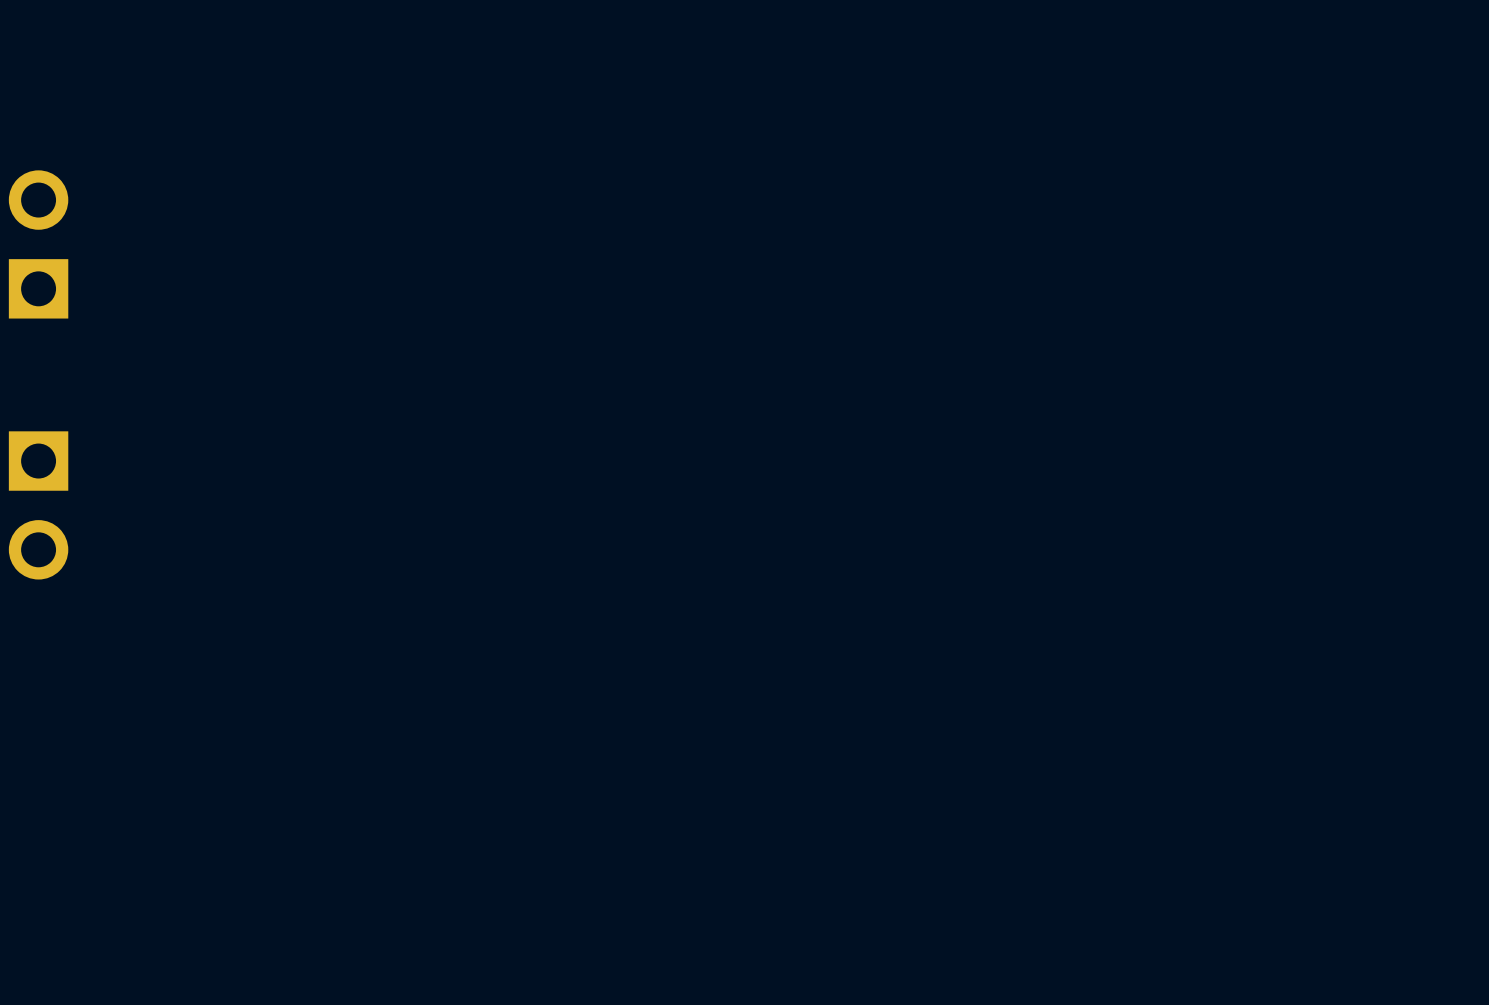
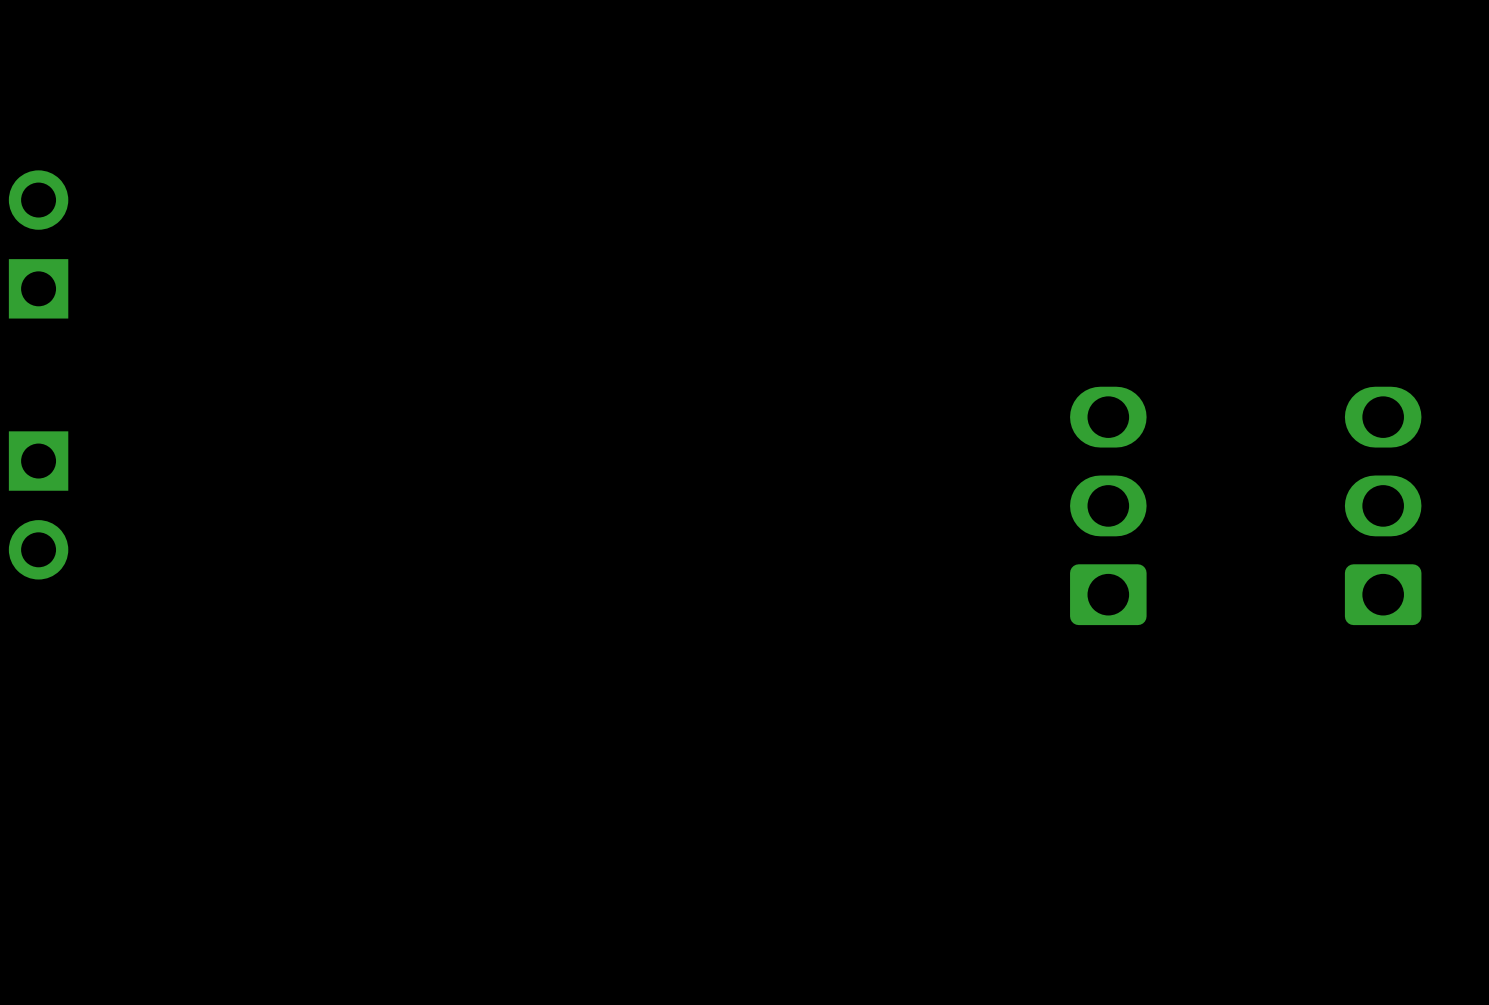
part: none -> (1108, 505)
part: none -> (1383, 505)

